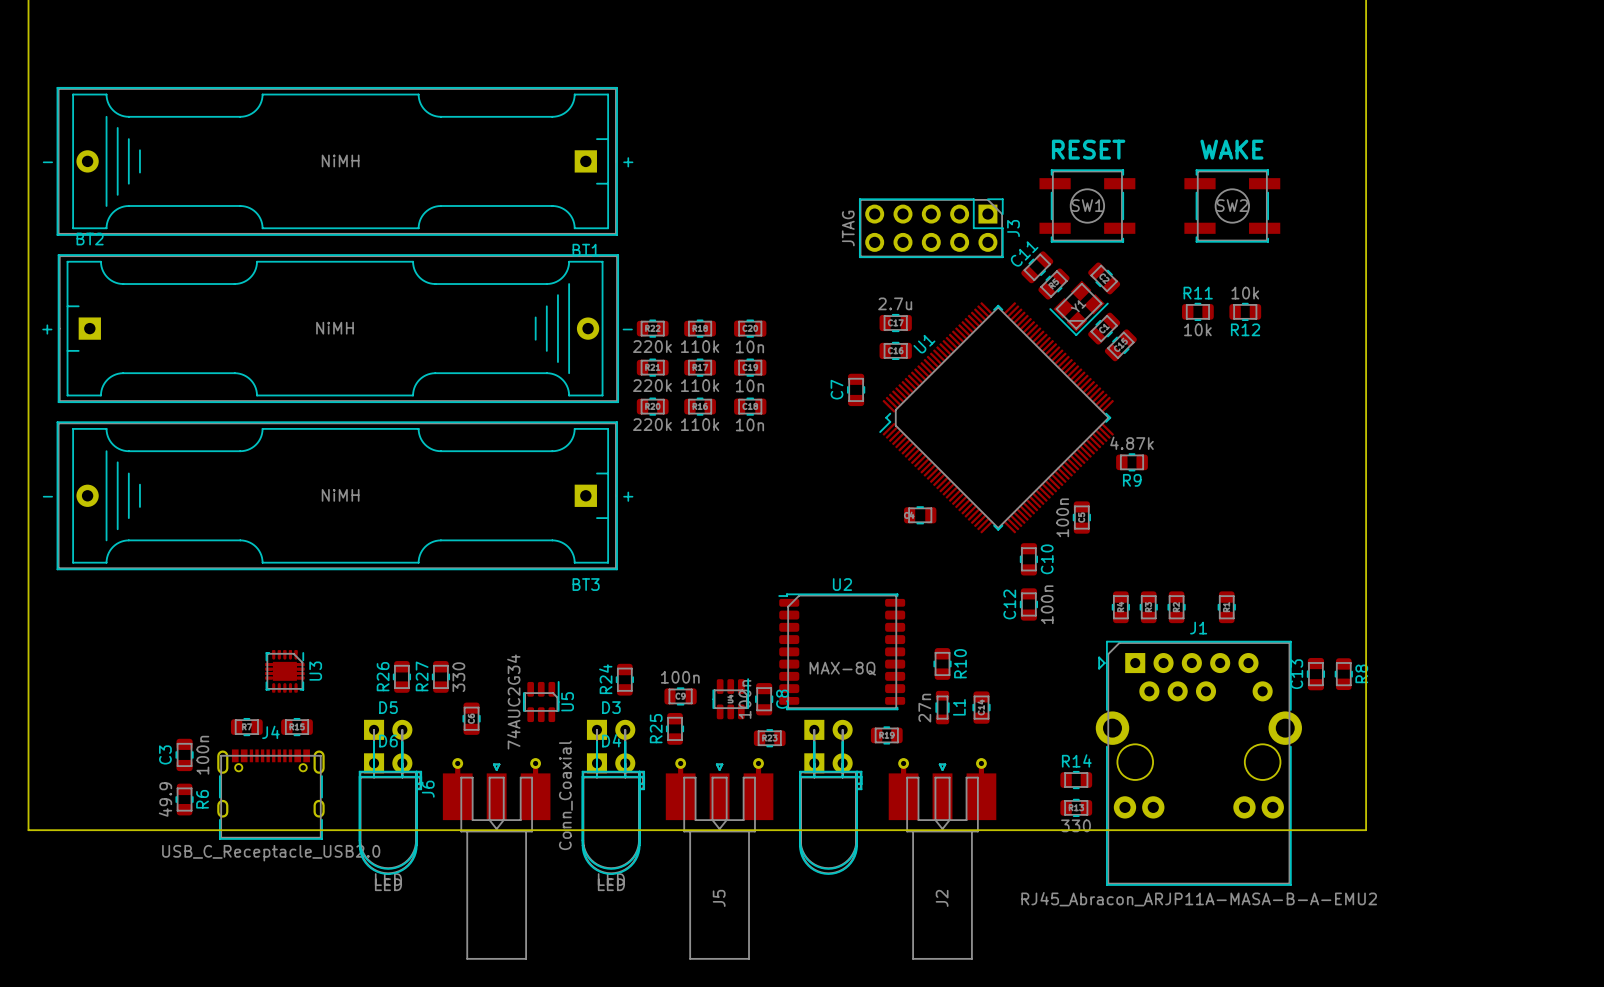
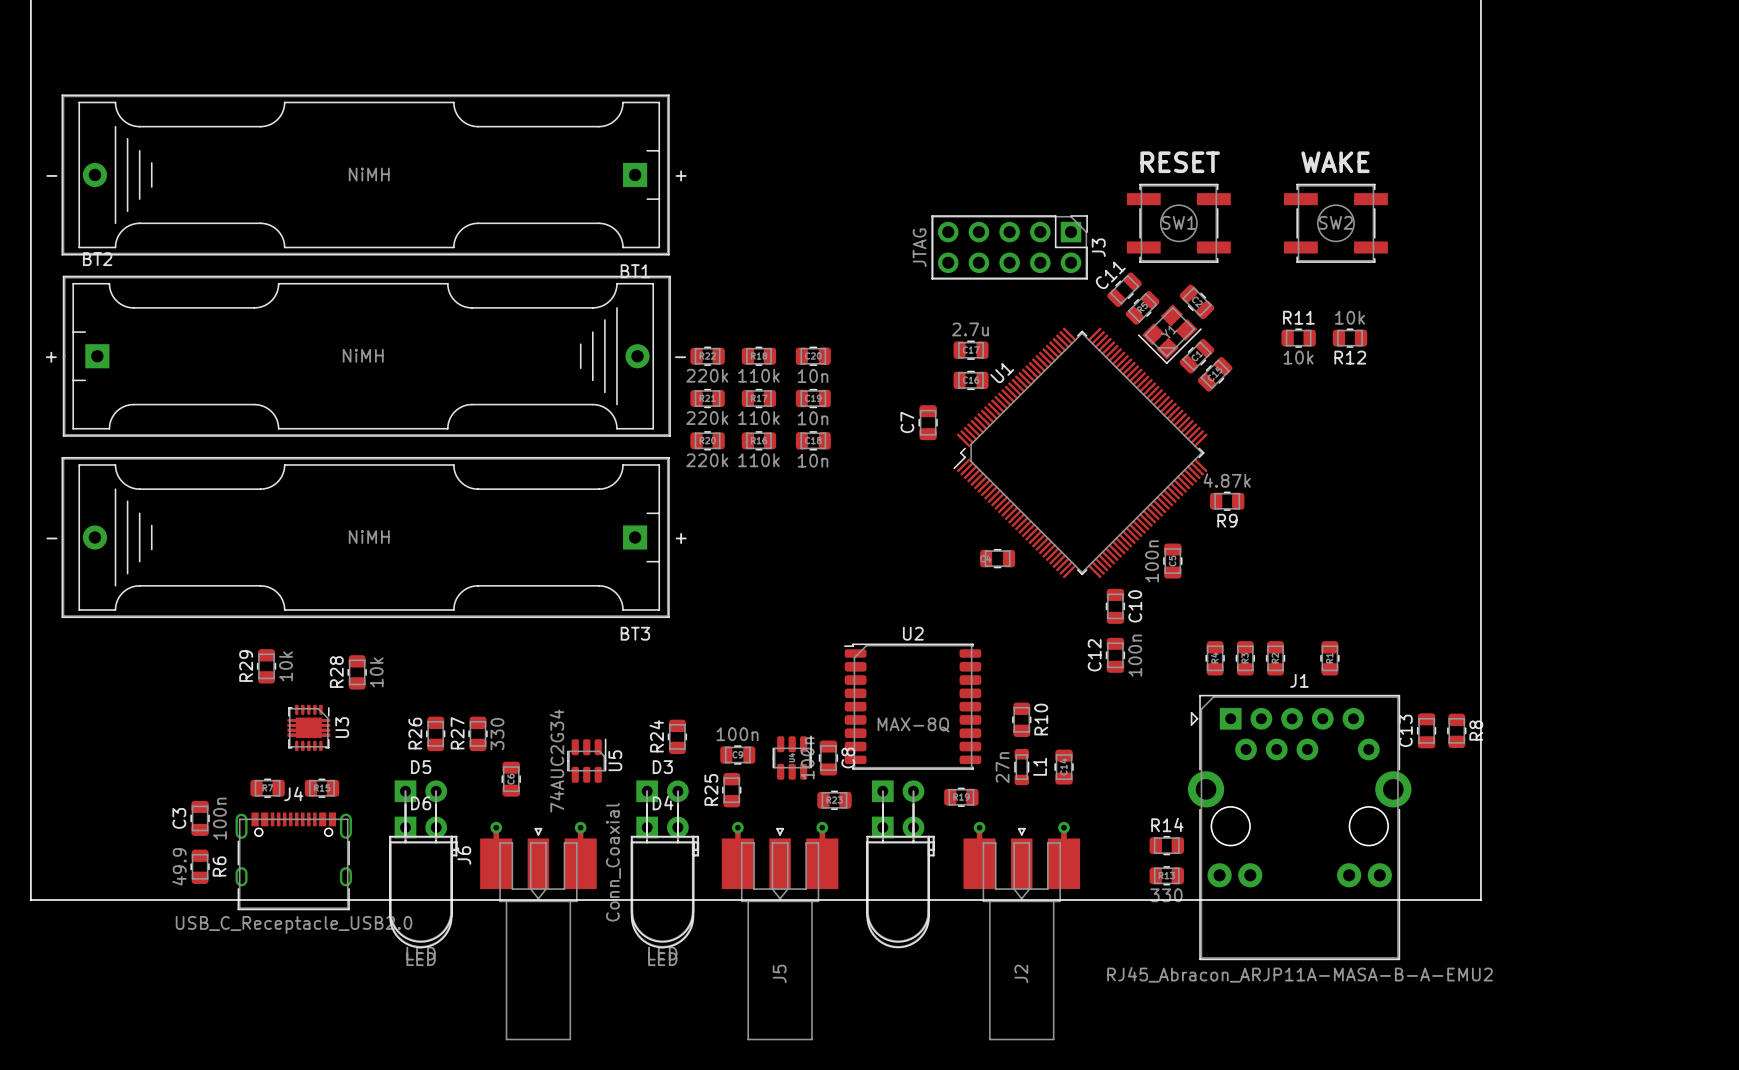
R29: none -> 10k (266, 666)
R28: none -> 10k (357, 672)

